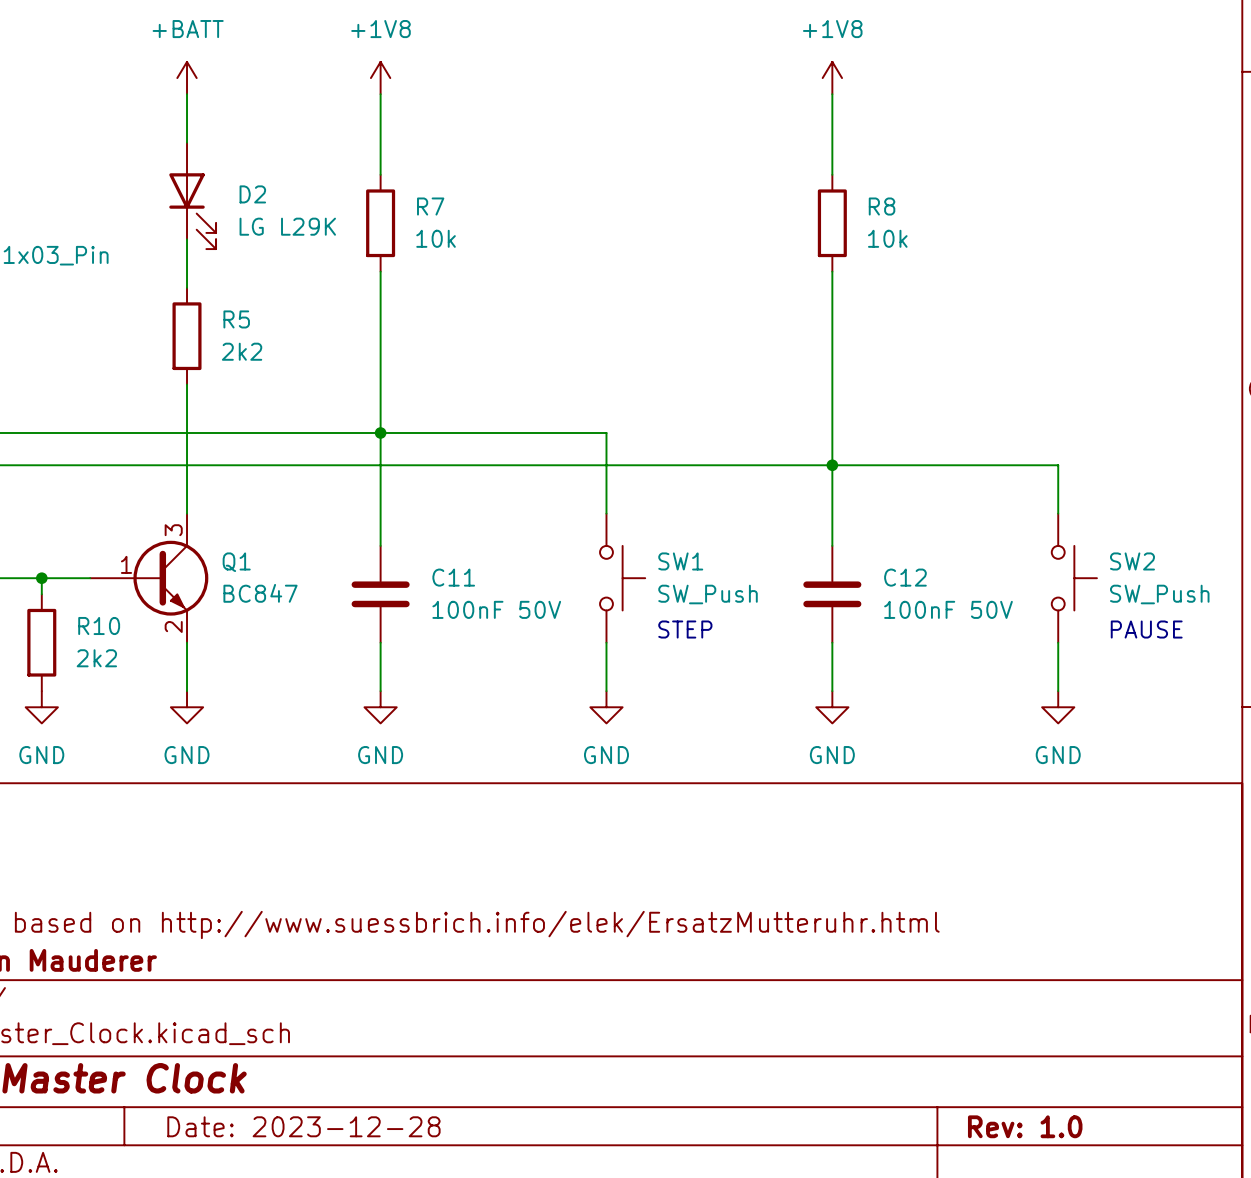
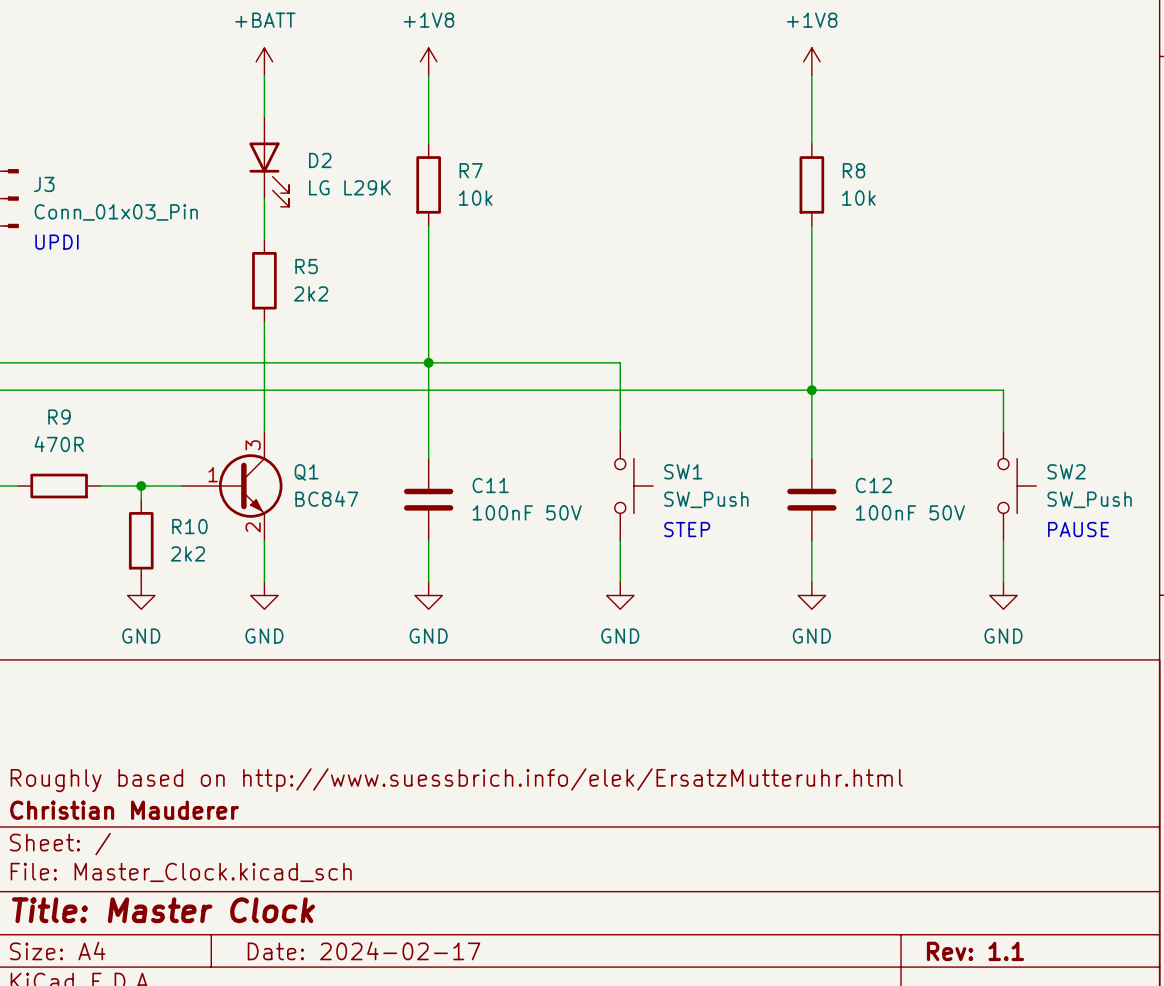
title block: Date: 2023-12-28 (303, 1126) -> Date: 2024-02-17 (364, 951)
title block: Rev: 1.0 (1025, 1126) -> Rev: 1.1 (975, 951)

